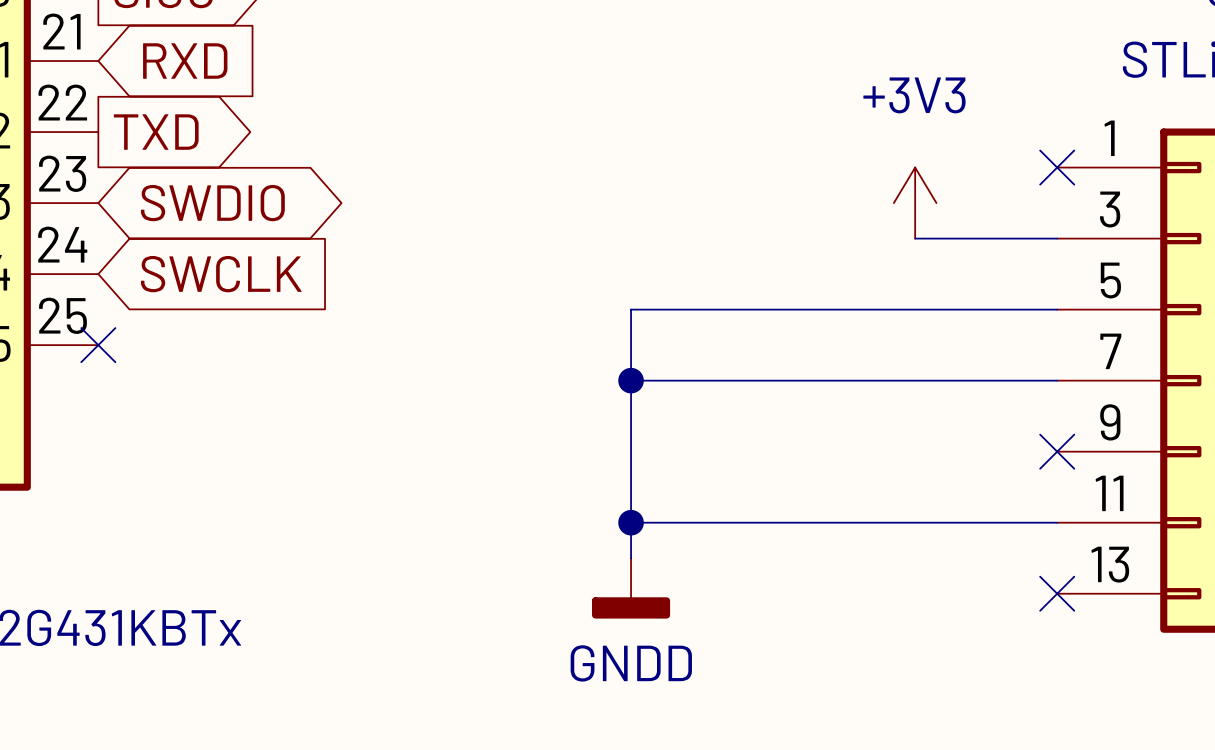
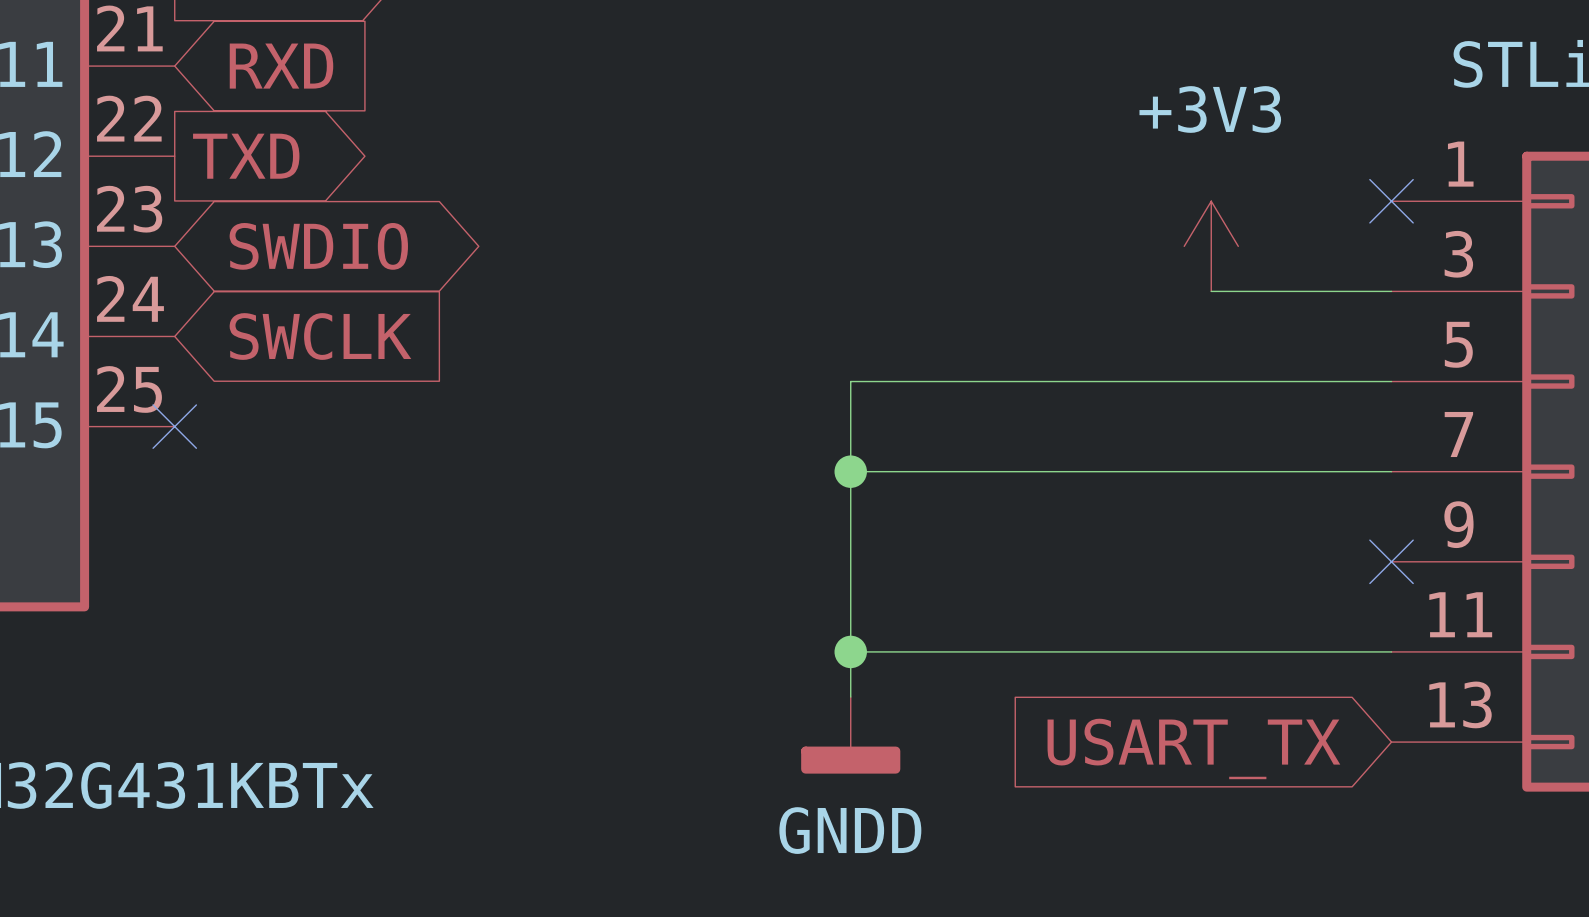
global label: none -> USART_TX (1193, 748)
no-connect mark: (1057, 593) -> none

